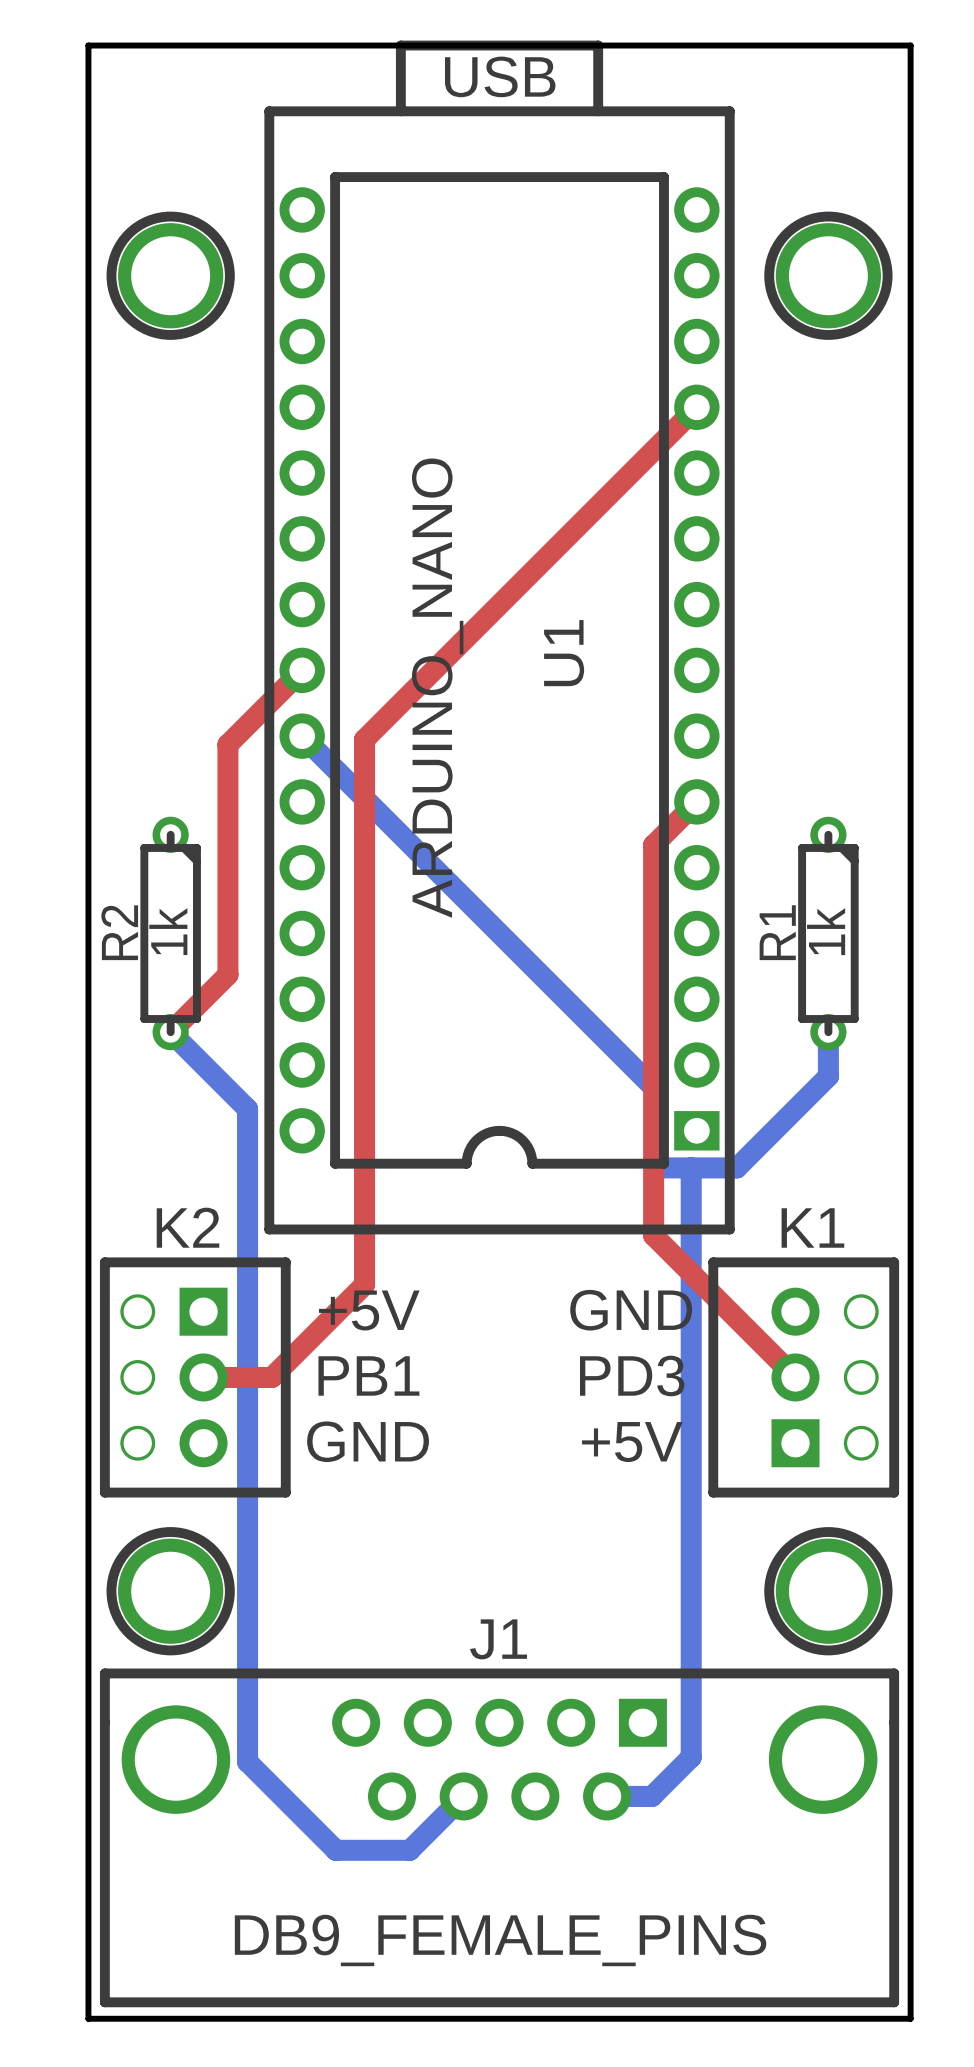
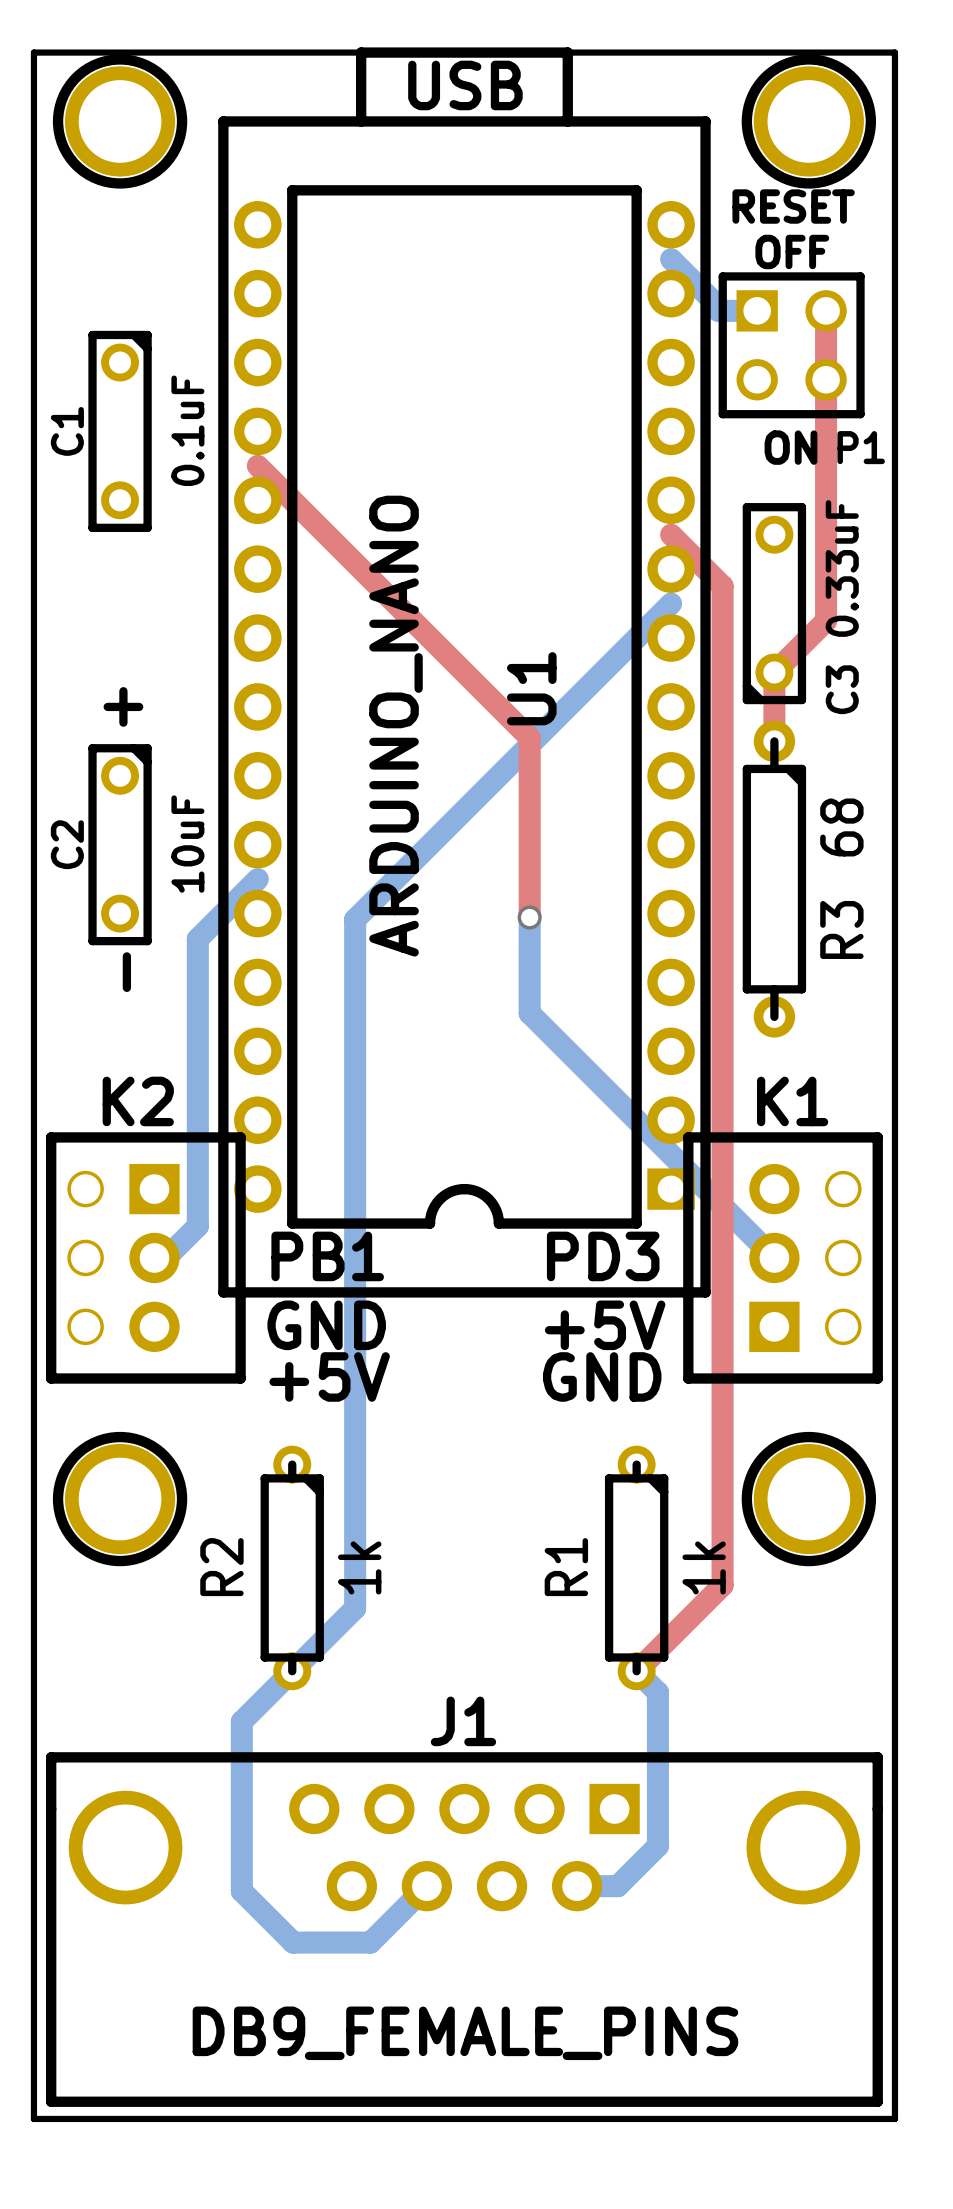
text: none -> RESET (793, 206)
text: none -> OFF (792, 251)
bottom track: none -> (671, 259) (718, 306) (718, 310) (757, 310)
part position: (170, 275) -> (120, 121)
part position: (828, 275) -> (808, 121)
top track: none -> (826, 310) (826, 620) (774, 672) (774, 741)
P1: none -> (791, 345)
C1: none -> 0.1uF (120, 431)
top track: (696, 407) (364, 739) (364, 1284) (271, 1377) (203, 1377) -> none
text: none -> ON (790, 447)
top track: none -> (257, 465) (529, 737) (529, 917)
top track: none -> (671, 534) (722, 586) (722, 1585) (636, 1671)
C3: none -> 0.33uF (774, 603)
top track: (302, 670) (227, 744) (227, 974) (170, 1032) -> none
bottom track: (302, 736) (655, 1089) (655, 1161) (661, 1167) (736, 1167) (828, 1076) (828, 1032) -> none
C2: none -> 10uF (120, 844)
top track: (696, 801) (653, 845) (653, 1235) (795, 1377) -> none
bottom track: none -> (257, 879) (197, 939) (197, 1226) (165, 1257) (154, 1257)
R3: none -> 68 (774, 879)
bottom track: none -> (529, 917) (529, 1013) (774, 1257)
via: none -> (529, 917)
R2 value position: 1k (168, 931) -> 1k (359, 1567)
R1 value position: 1k (826, 931) -> 1k (704, 1567)
R2 name position: R2 (119, 932) -> R2 (221, 1567)
R1 name position: R1 (777, 932) -> R1 (566, 1567)
R2 position: (170, 933) -> (292, 1567)
R1 position: (828, 933) -> (636, 1567)
bottom track: (170, 1032) (247, 1109) (247, 1761) (286, 1801) -> (671, 603) (355, 919) (355, 1608) (241, 1721) (241, 1891)
bottom track: (691, 1167) (691, 1757) (651, 1796) (645, 1796) -> (636, 1671) (657, 1692) (657, 1846) (617, 1886)
K2 position: (195, 1377) -> (145, 1257)
K1 position: (803, 1377) -> (783, 1257)
text position: GND (368, 1441) -> GND (326, 1325)
text position: +5V (632, 1442) -> +5V (605, 1325)
part position: (170, 1591) -> (120, 1499)
part position: (828, 1591) -> (808, 1499)

